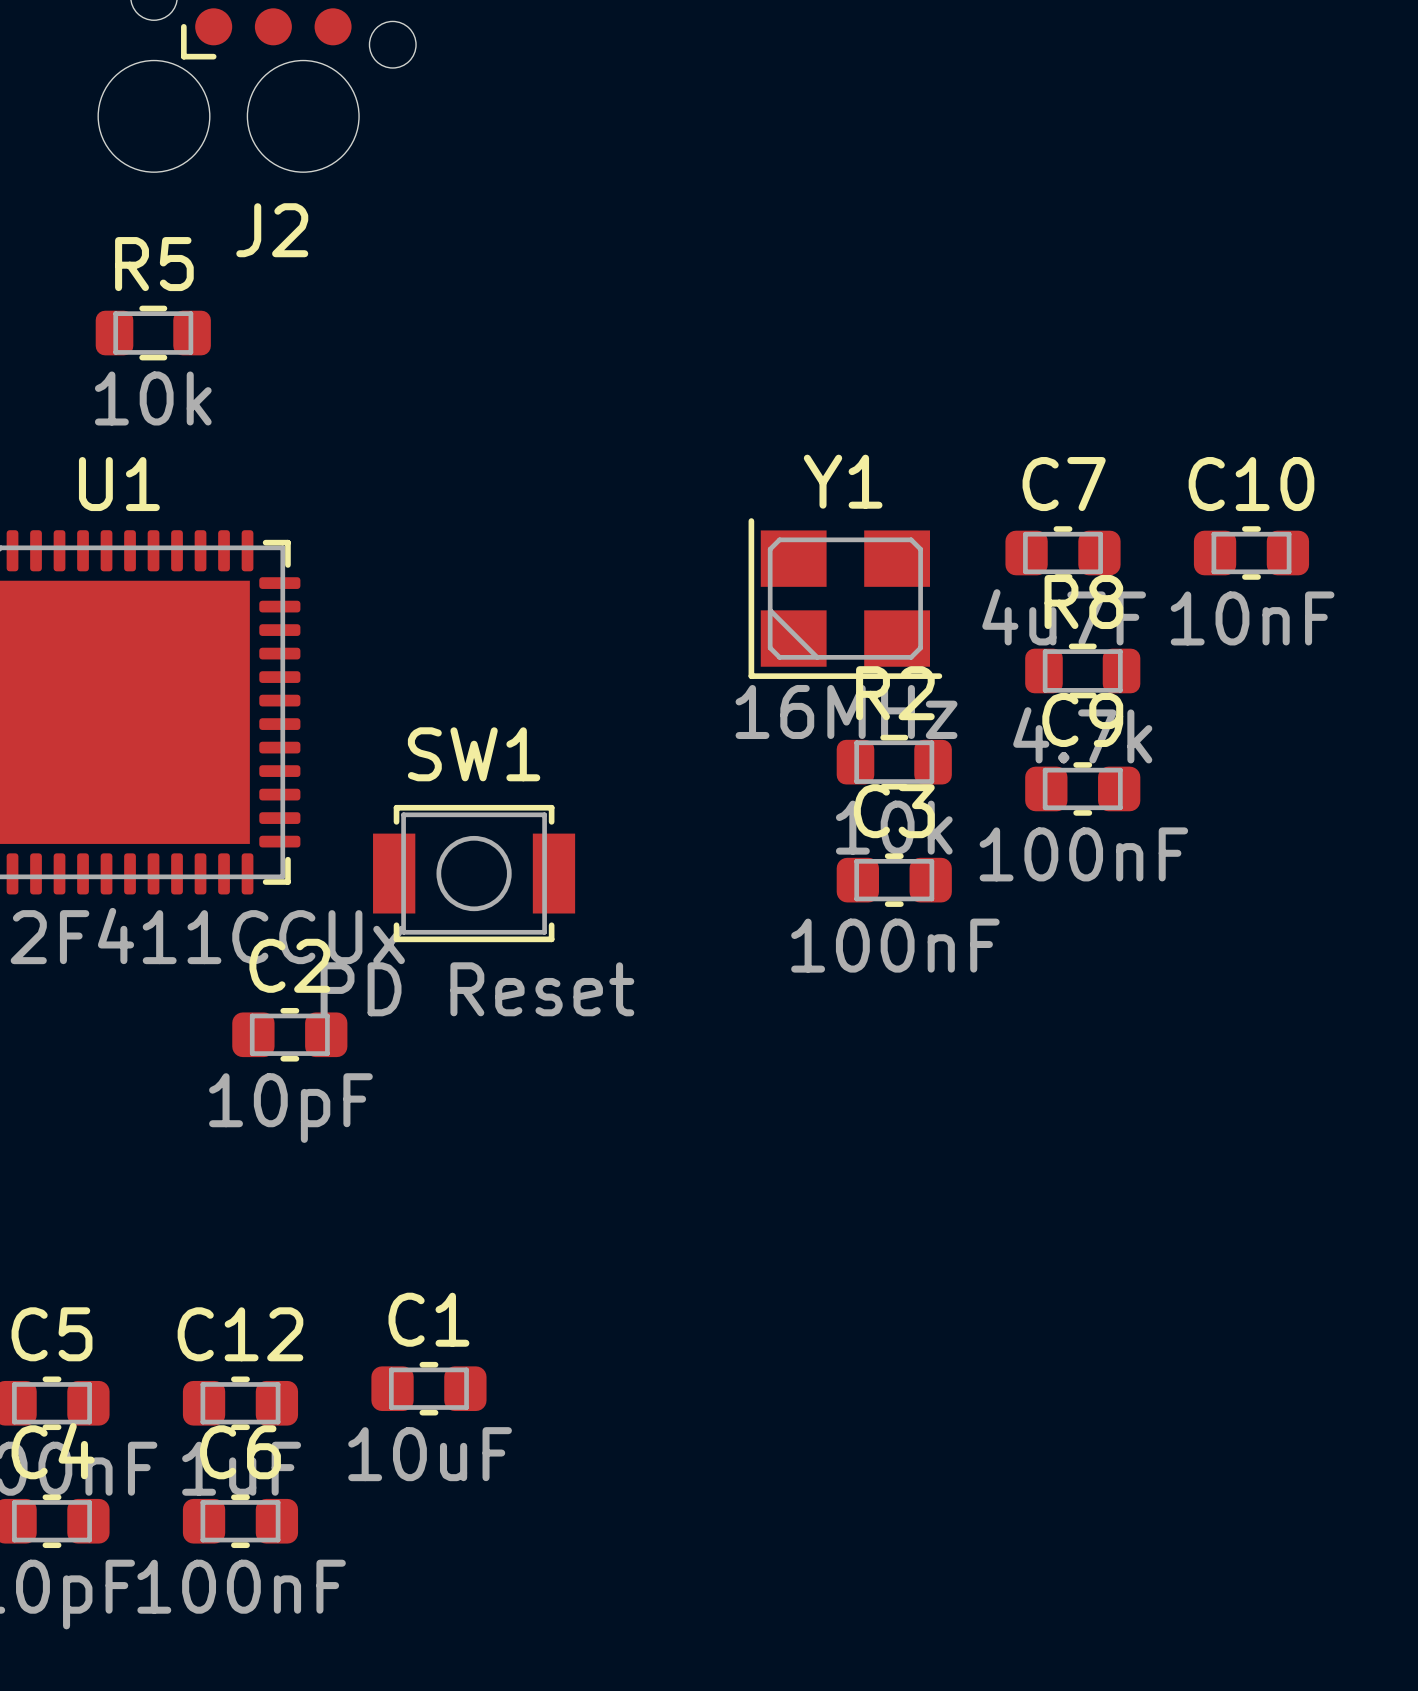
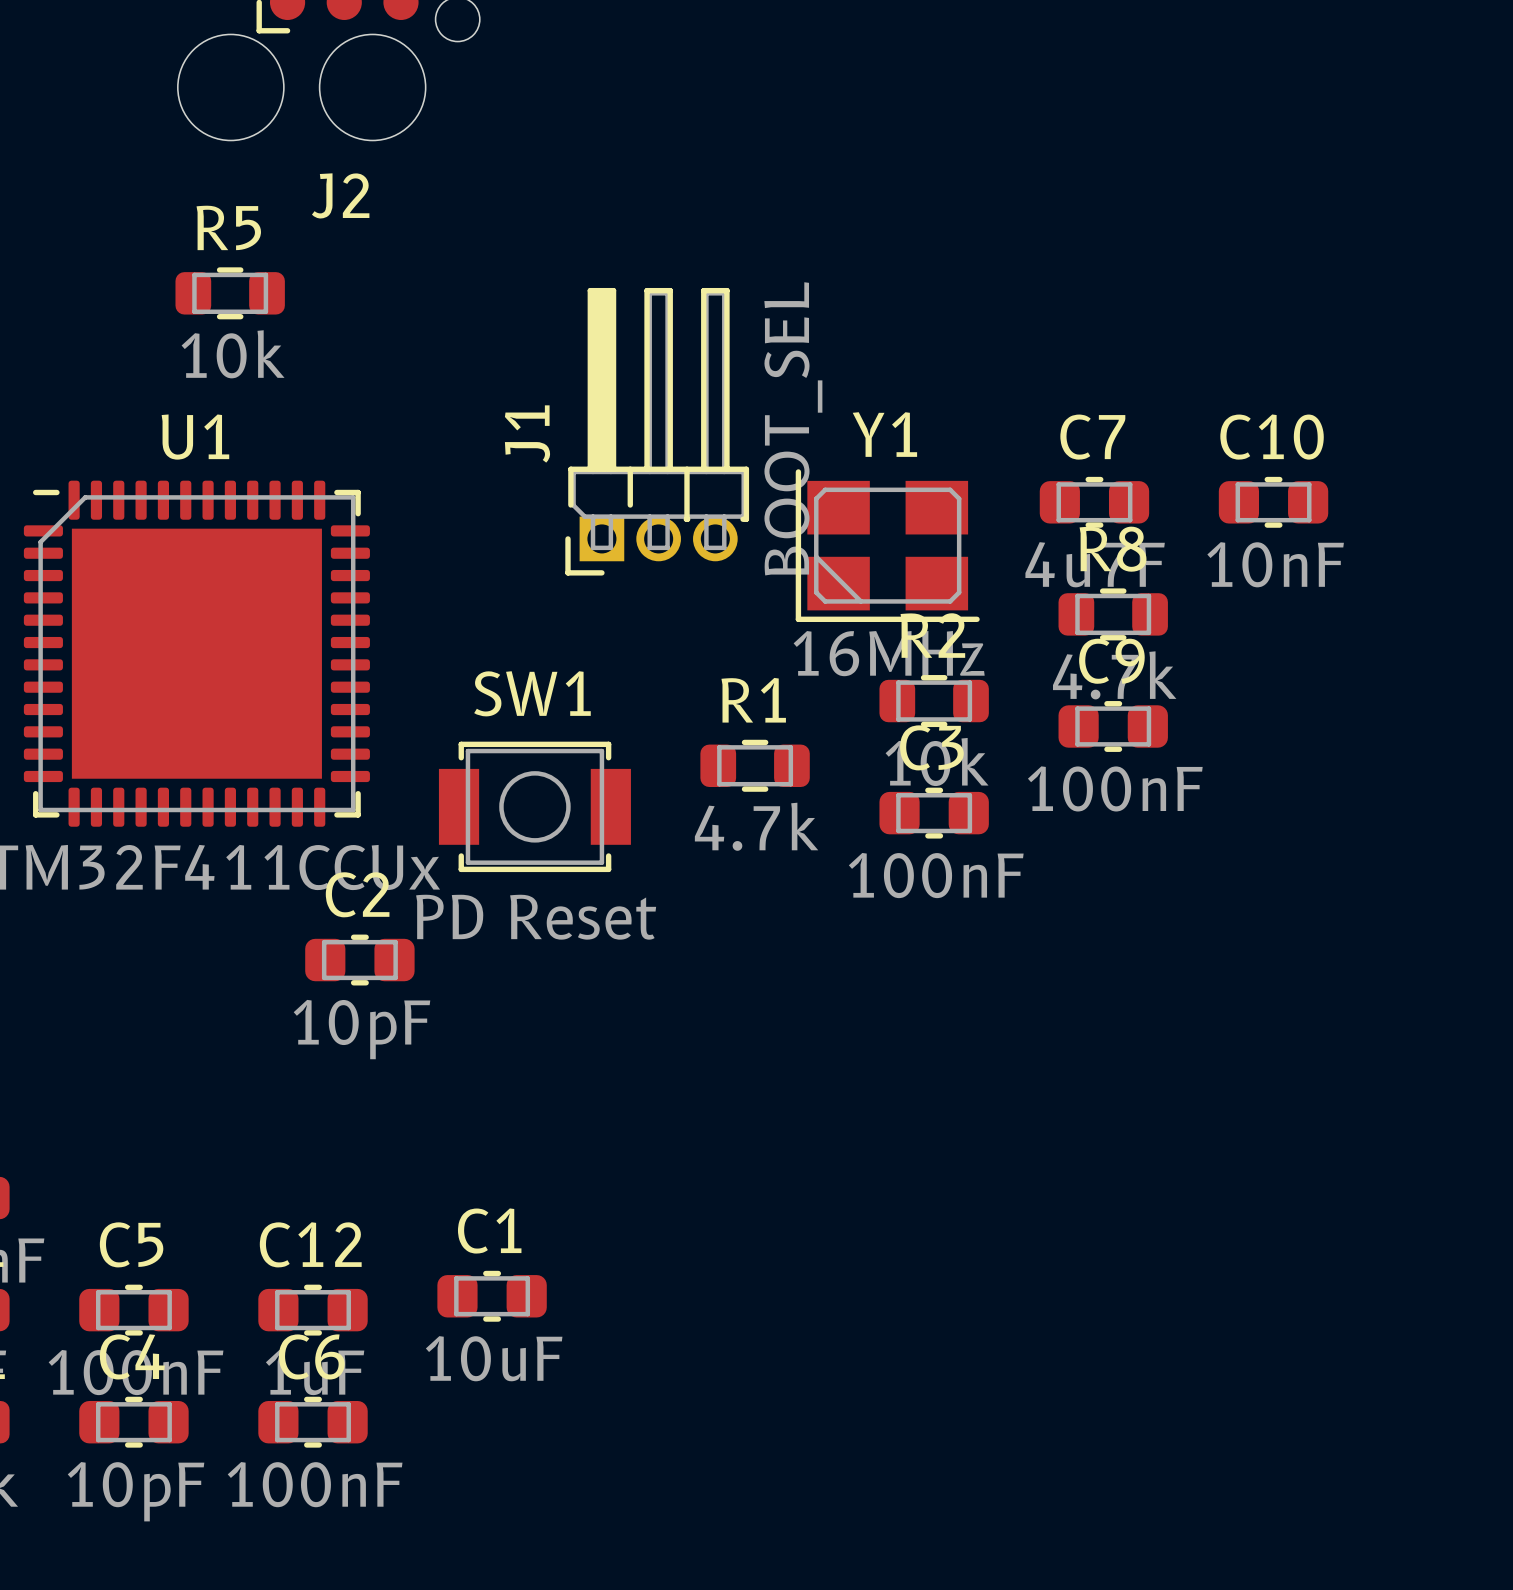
J1: none -> BOOT_SEL (657, 431)
R1: none -> 4.7k (755, 765)

